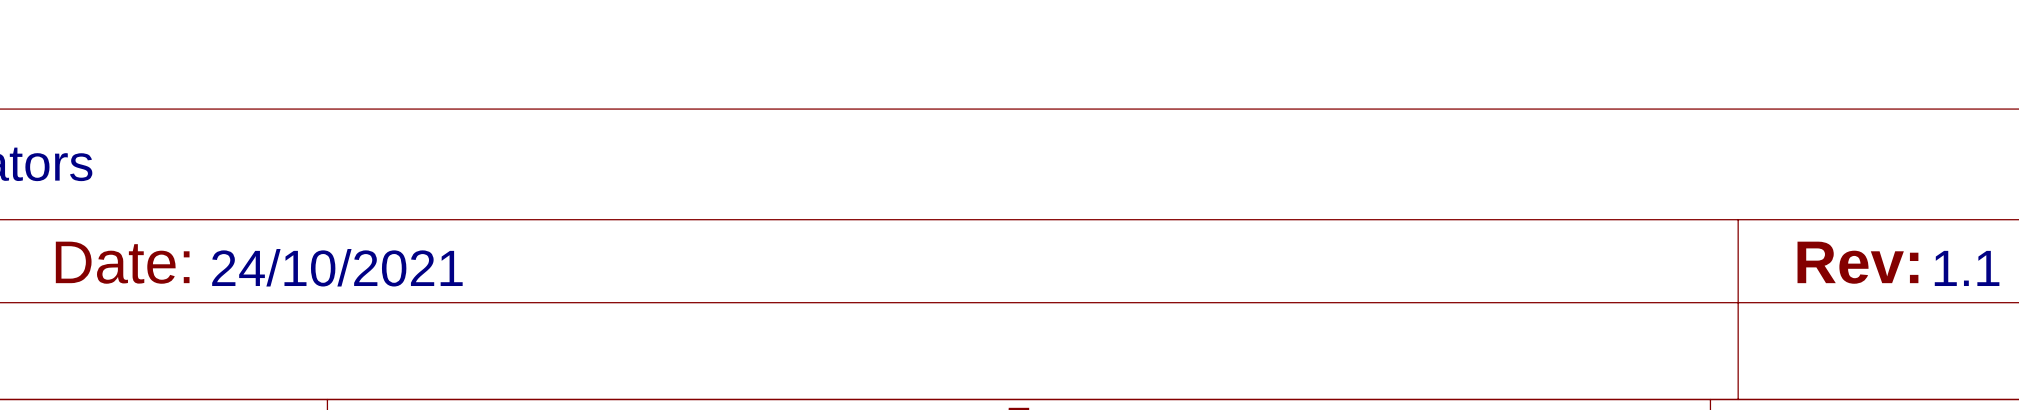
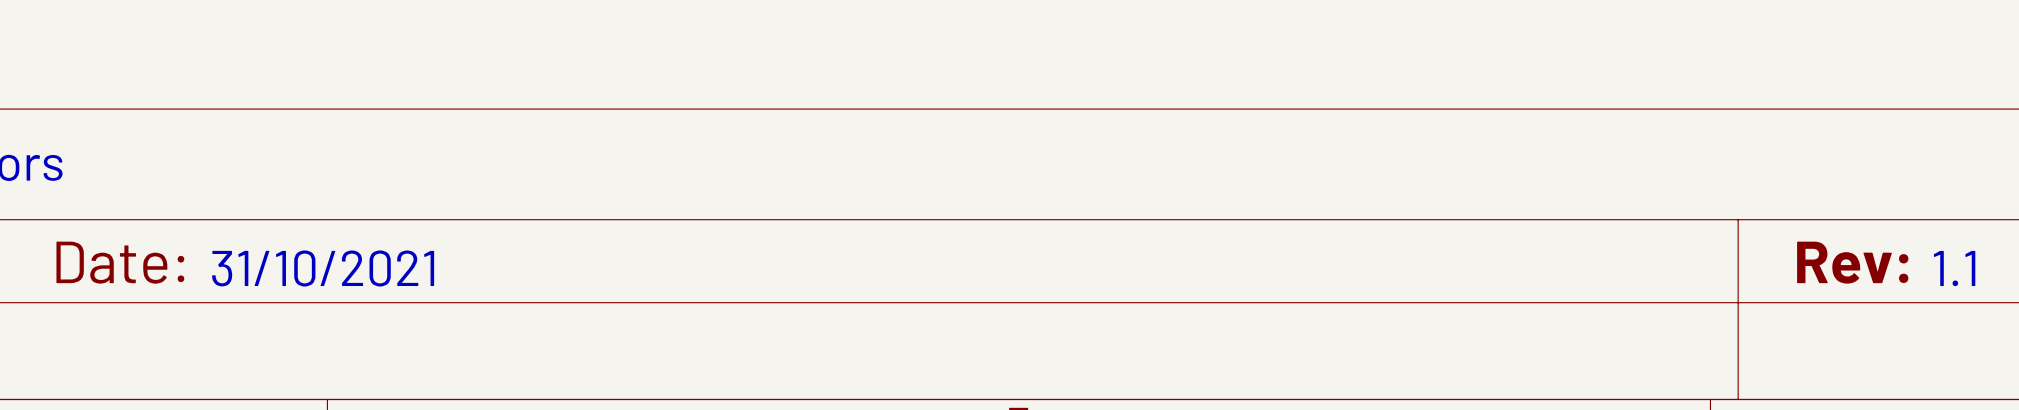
text: 24/10/2021 (337, 267) -> 31/10/2021 (323, 268)

